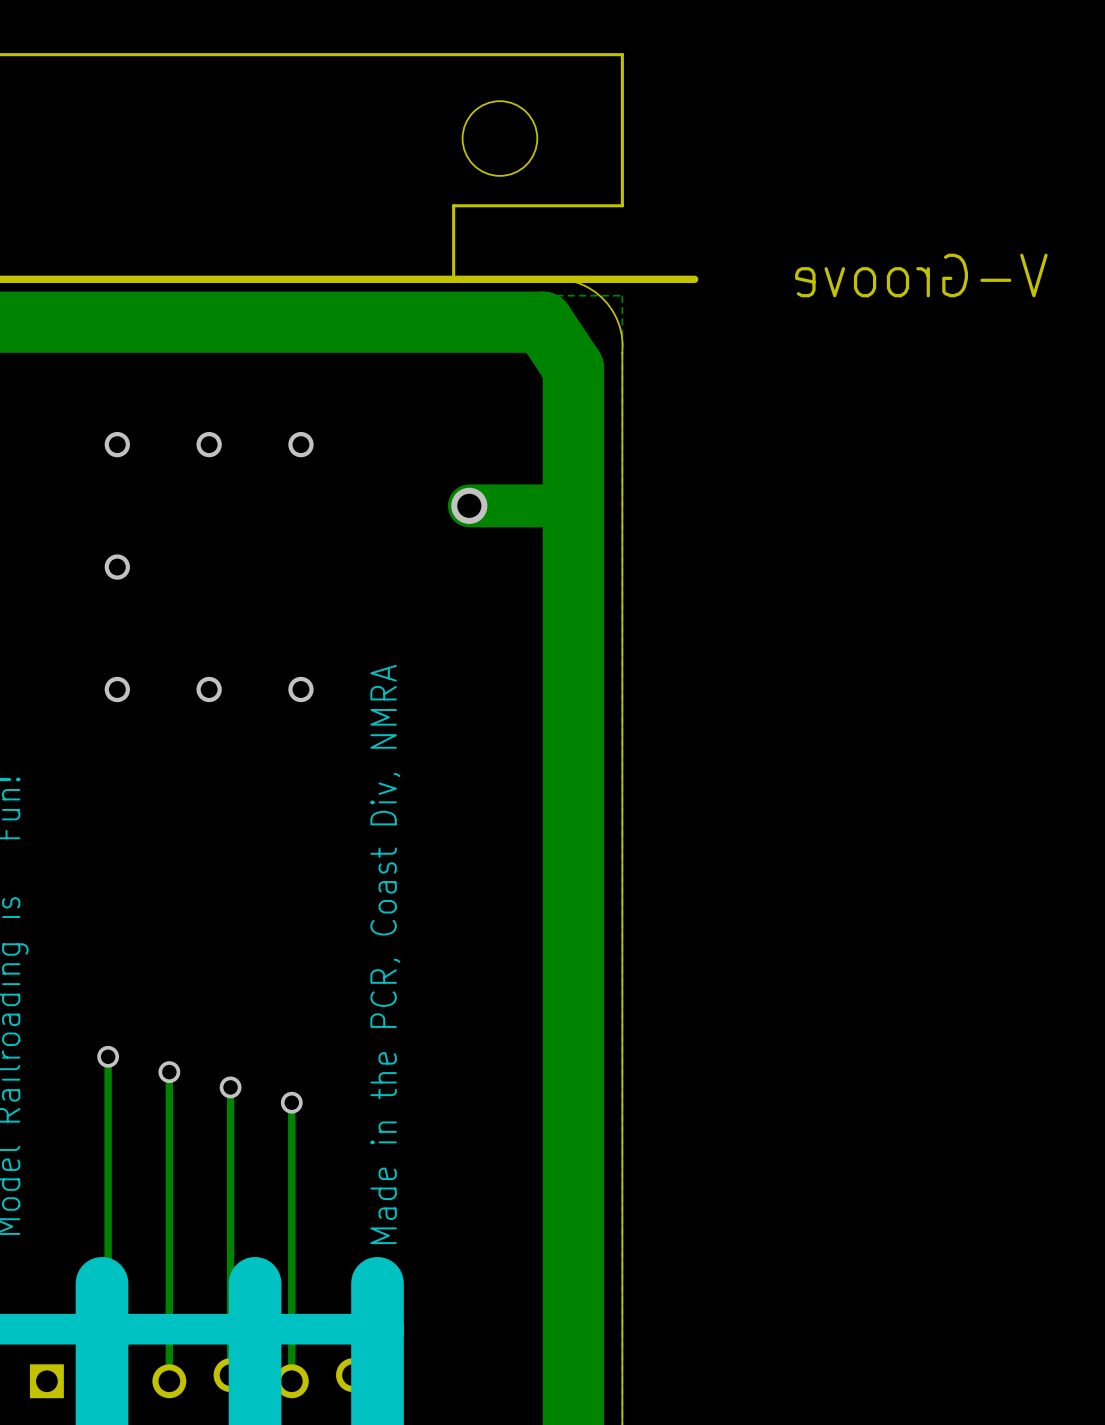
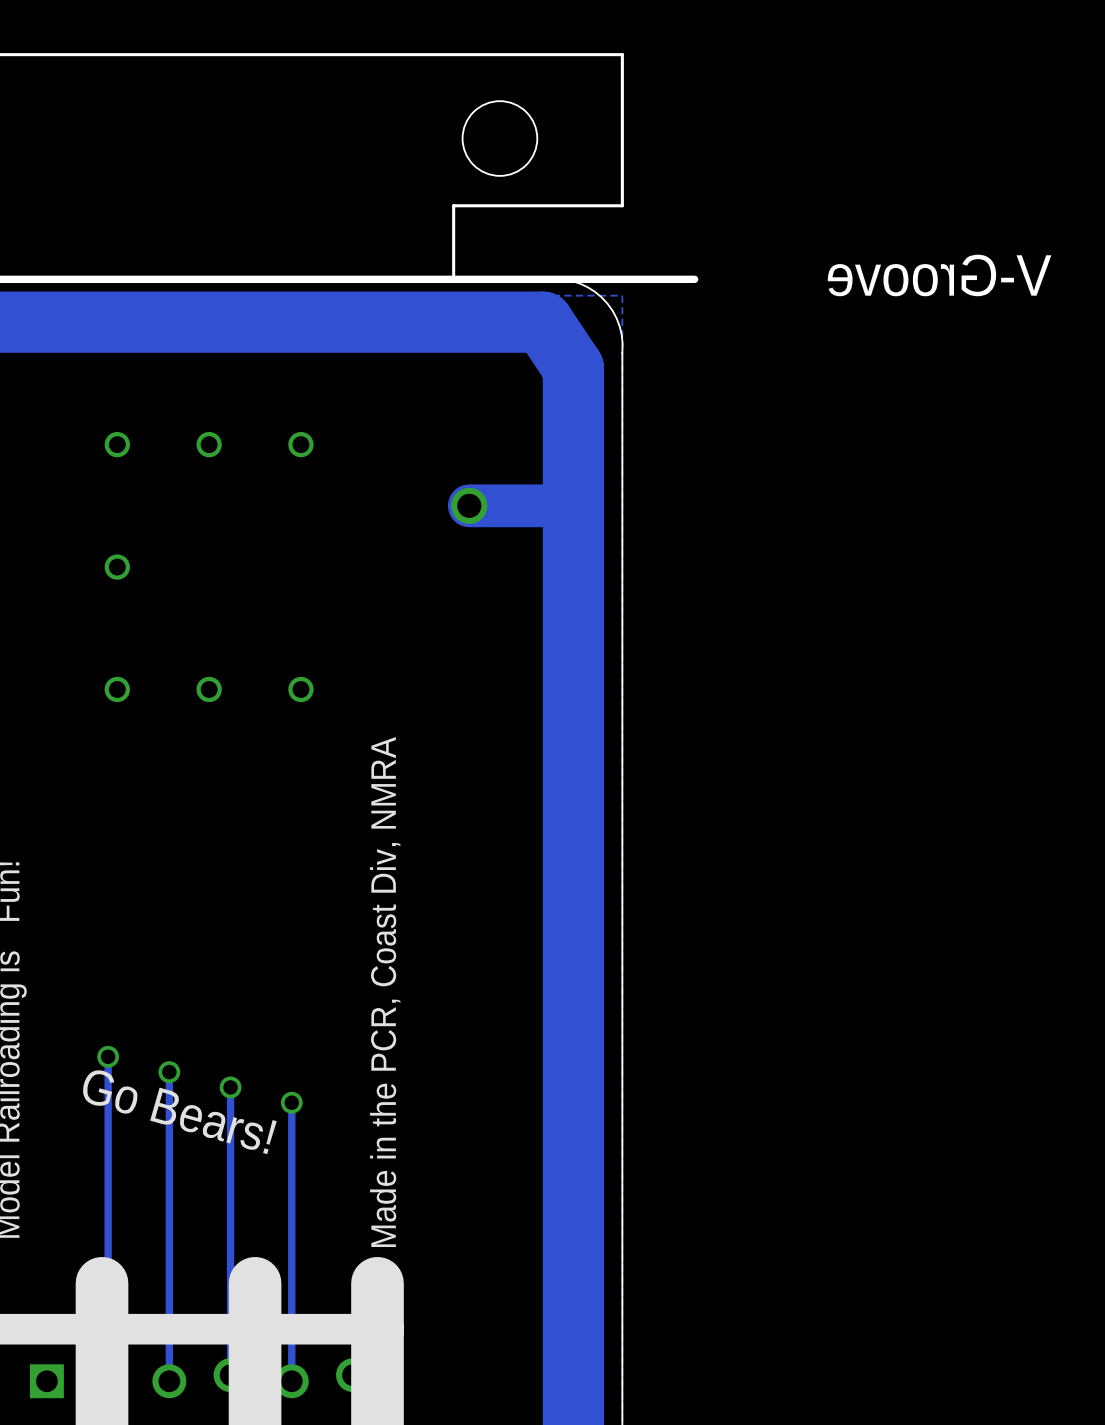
text: none -> Go Bears! (179, 1111)

